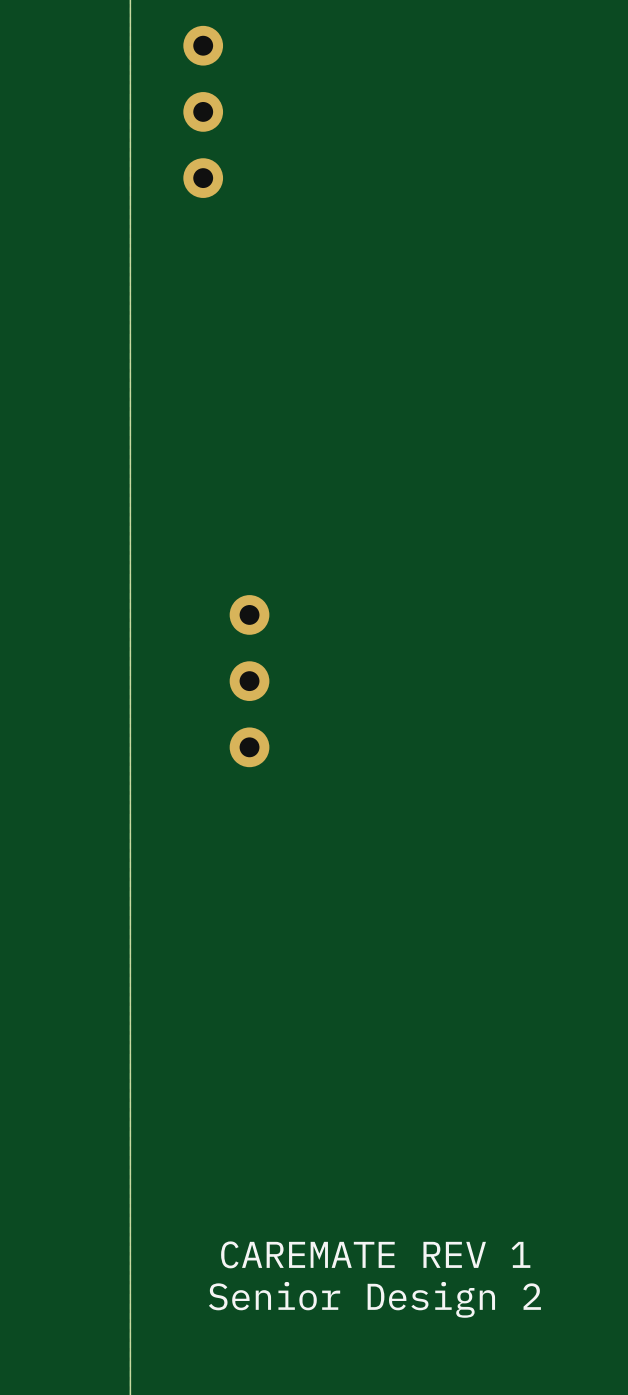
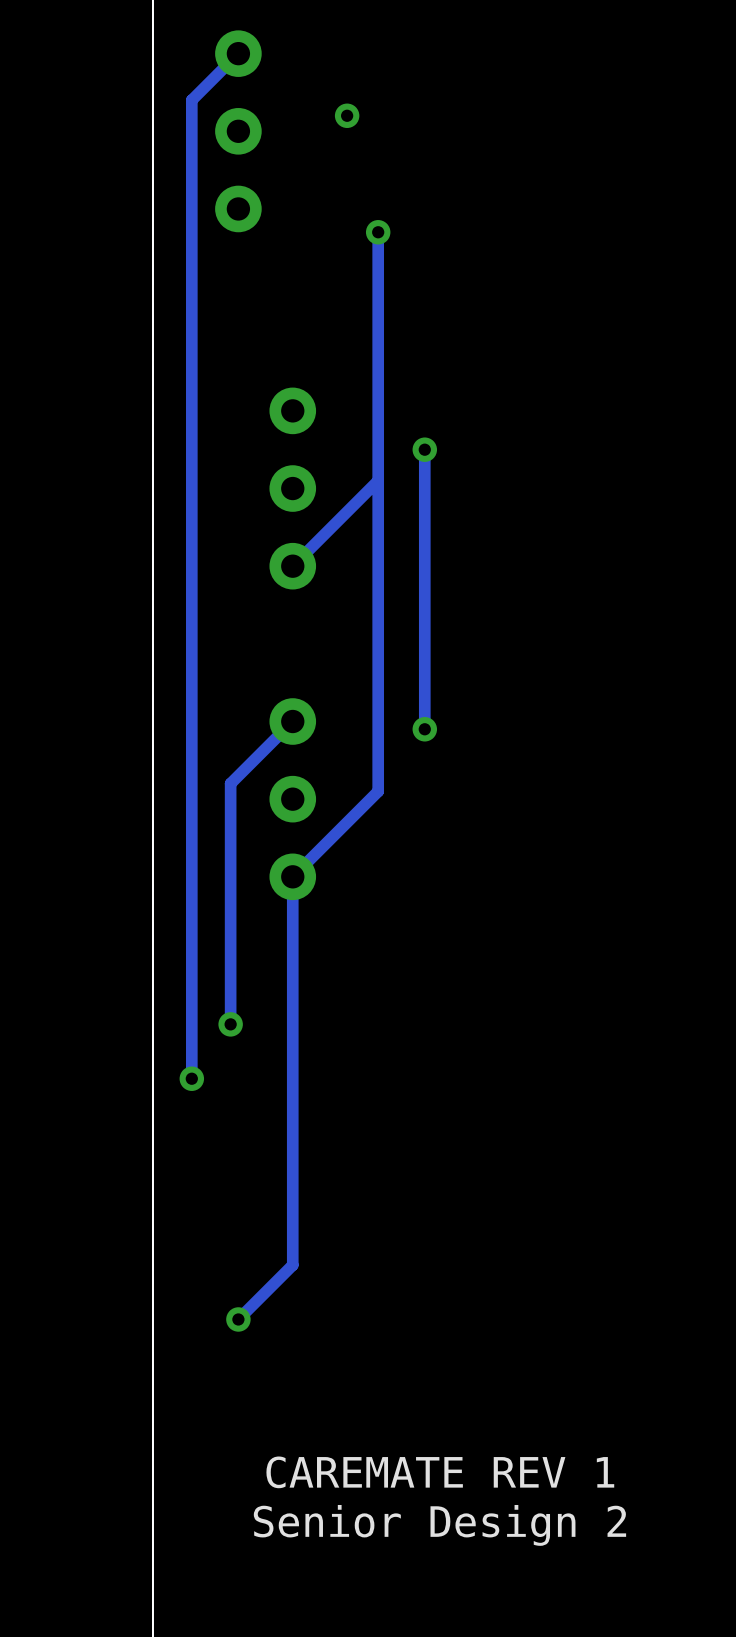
track: none -> (238, 53) (191, 100) (191, 1078)
via: none -> (347, 115)
track: none -> (378, 232) (378, 791) (292, 876) (292, 1265) (238, 1319)
via: none -> (378, 232)
track: none -> (424, 449) (424, 729)
via: none -> (424, 449)
track: none -> (378, 480) (292, 566)
part: none -> (292, 488)
track: none -> (292, 721) (230, 783) (230, 1024)
via: none -> (424, 729)
via: none -> (230, 1024)
via: none -> (191, 1078)
via: none -> (238, 1319)

